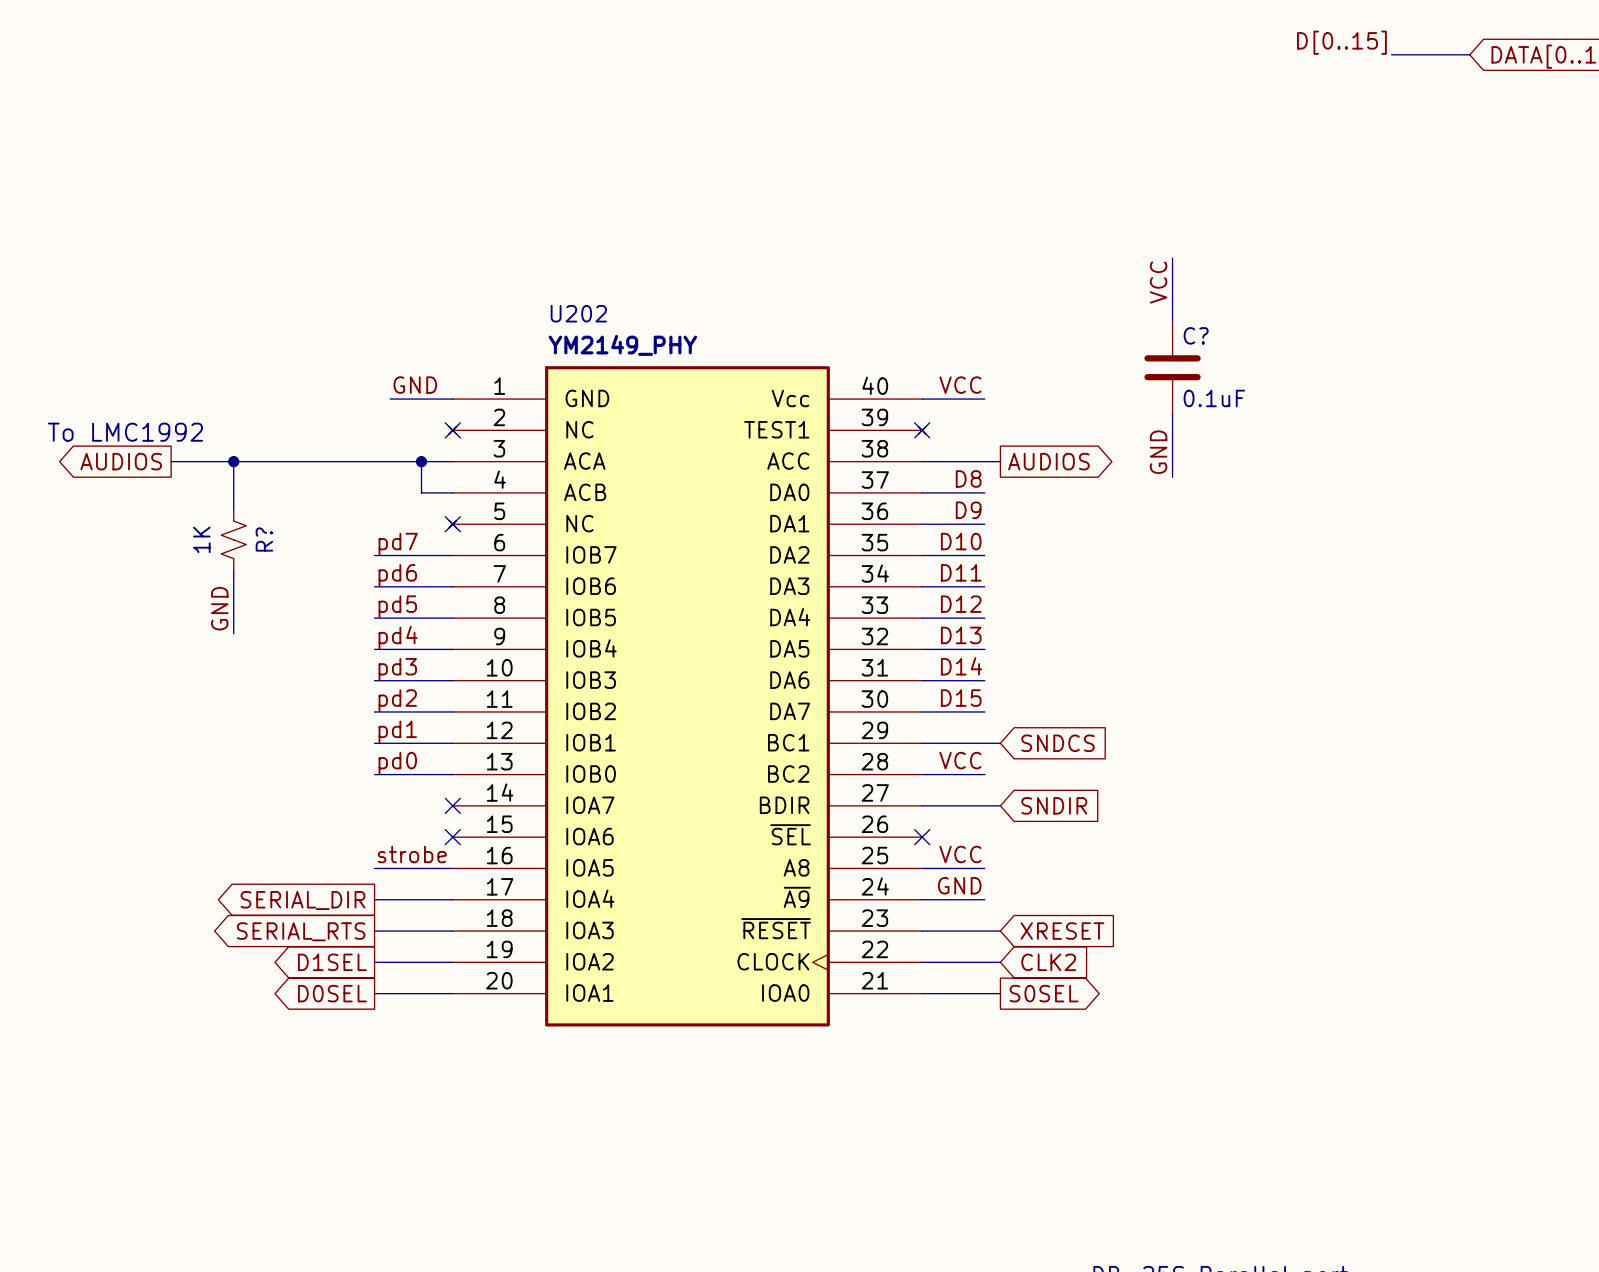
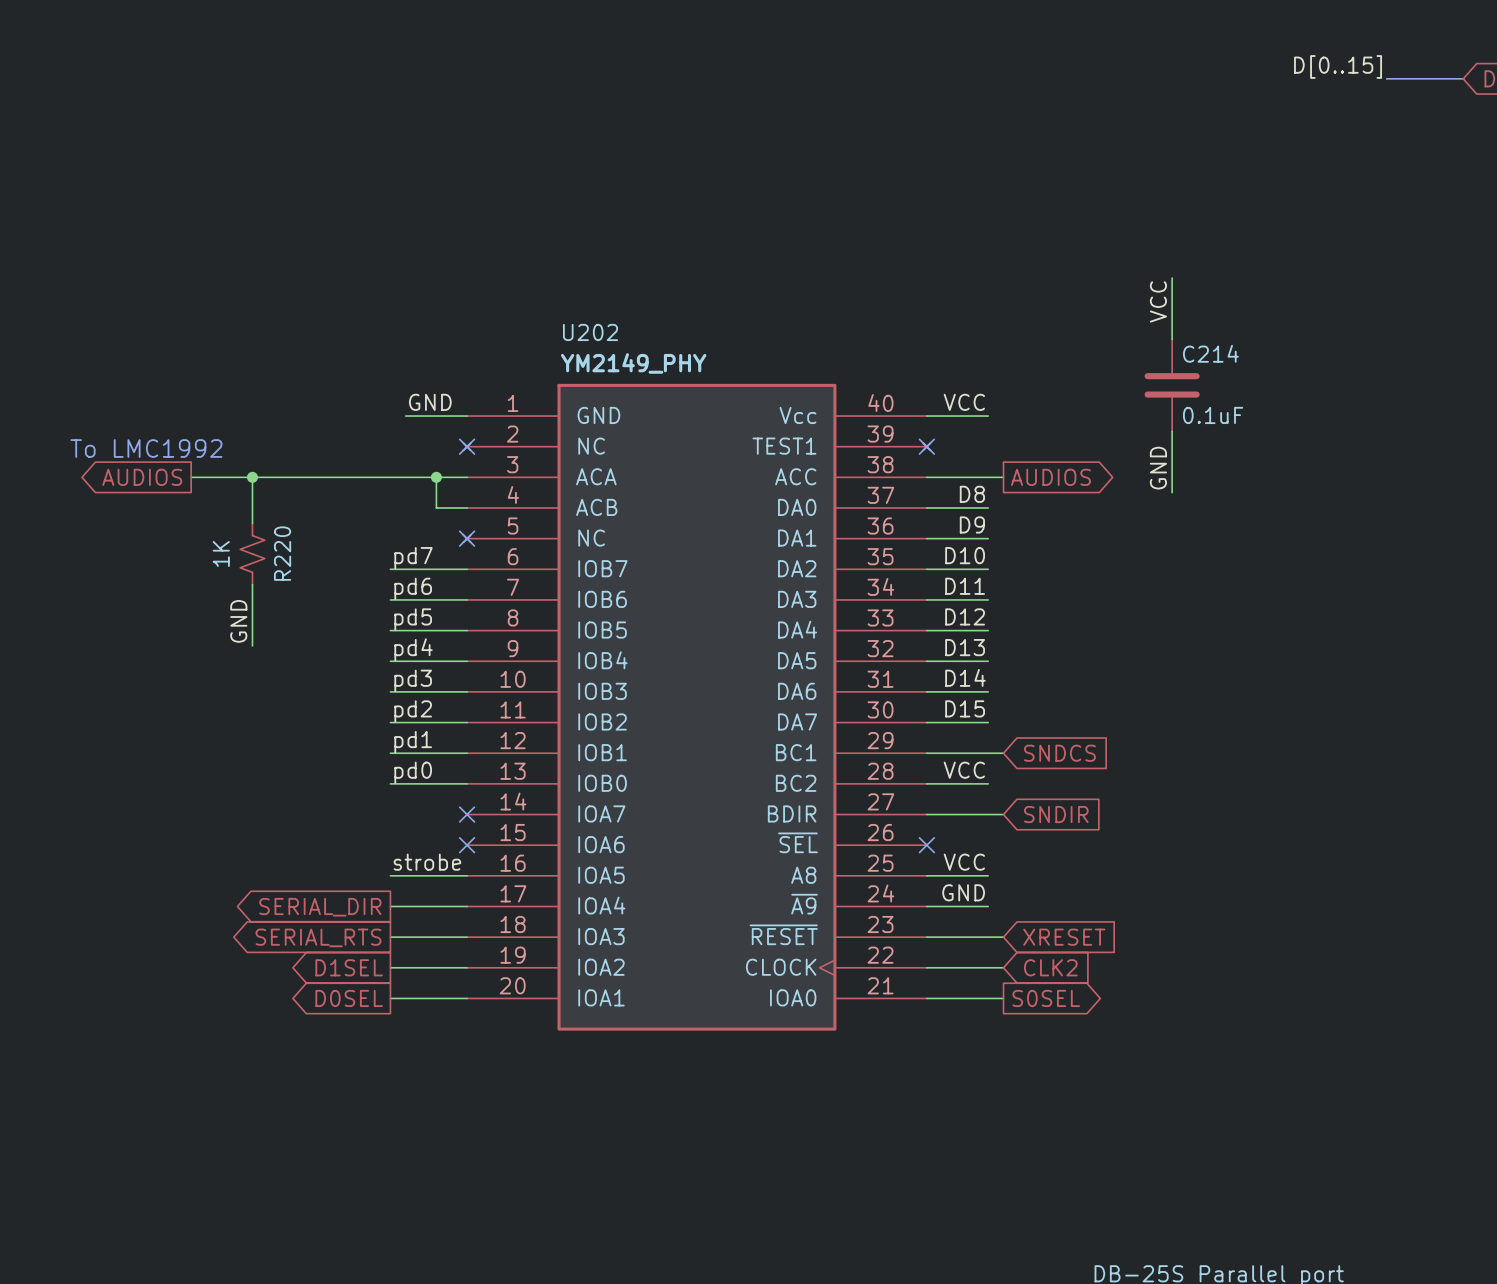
C? name: C? (1196, 335) -> C214 (1210, 353)
R? name: R? (264, 539) -> R220 (282, 553)

